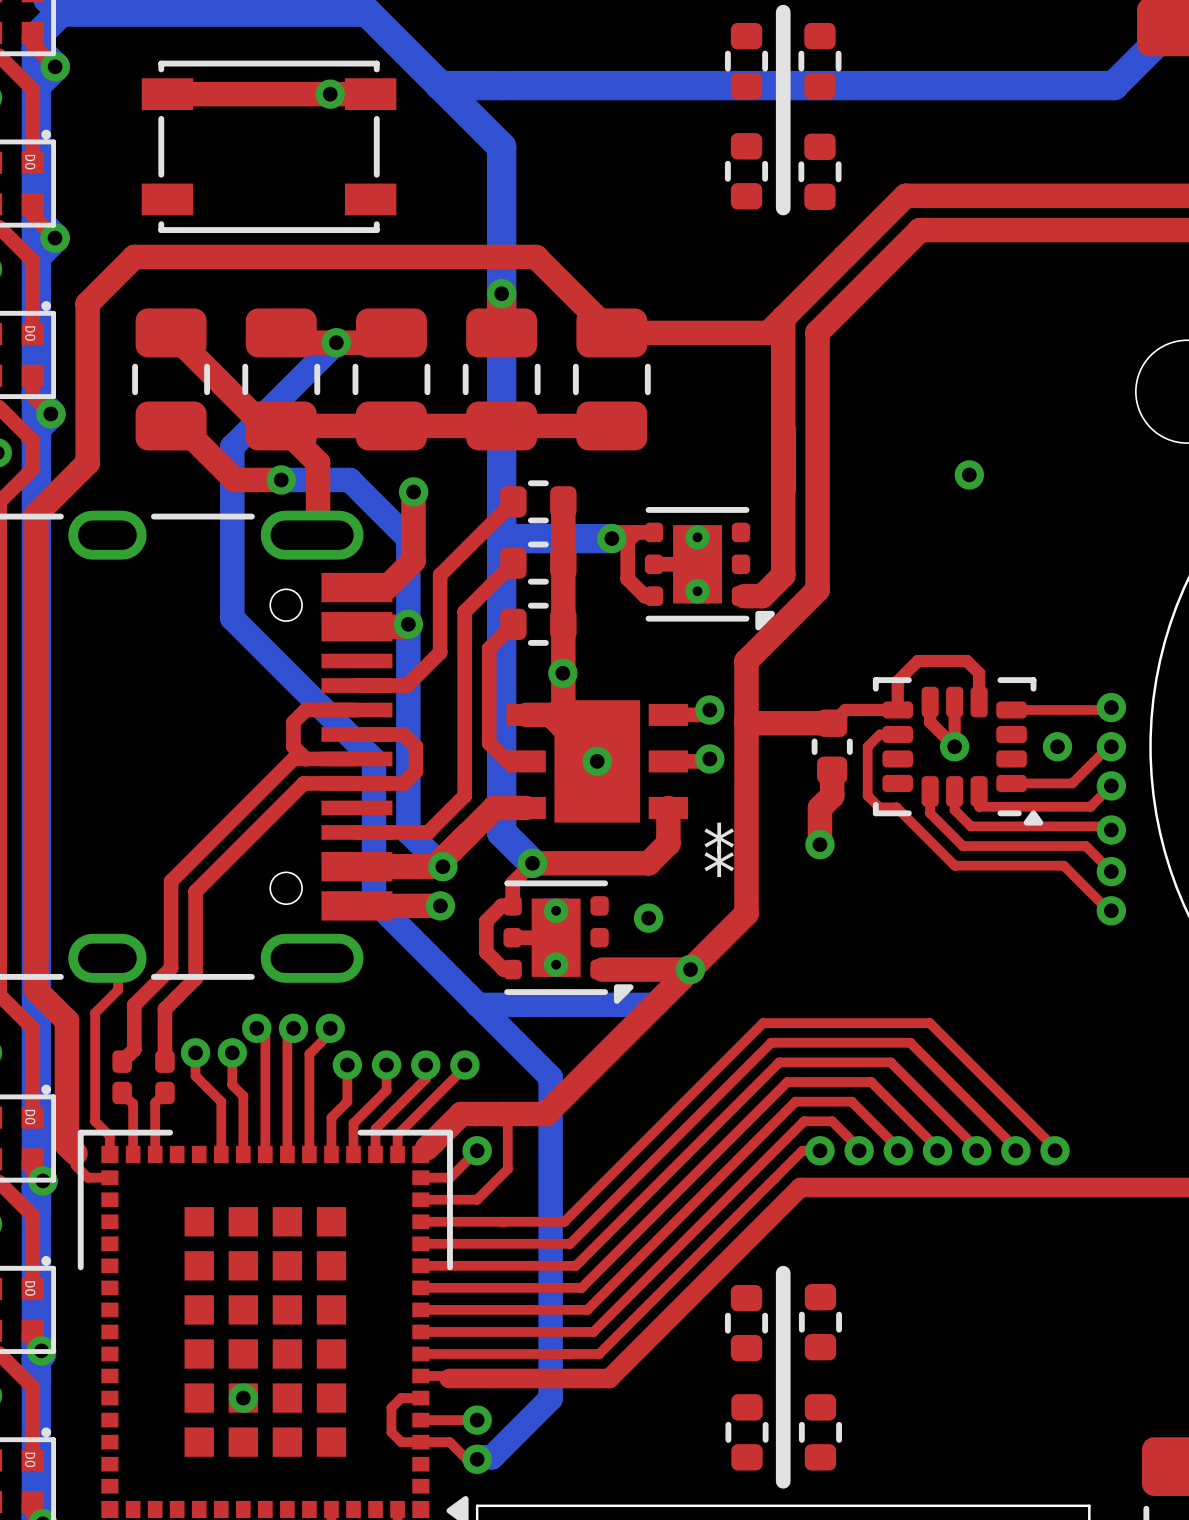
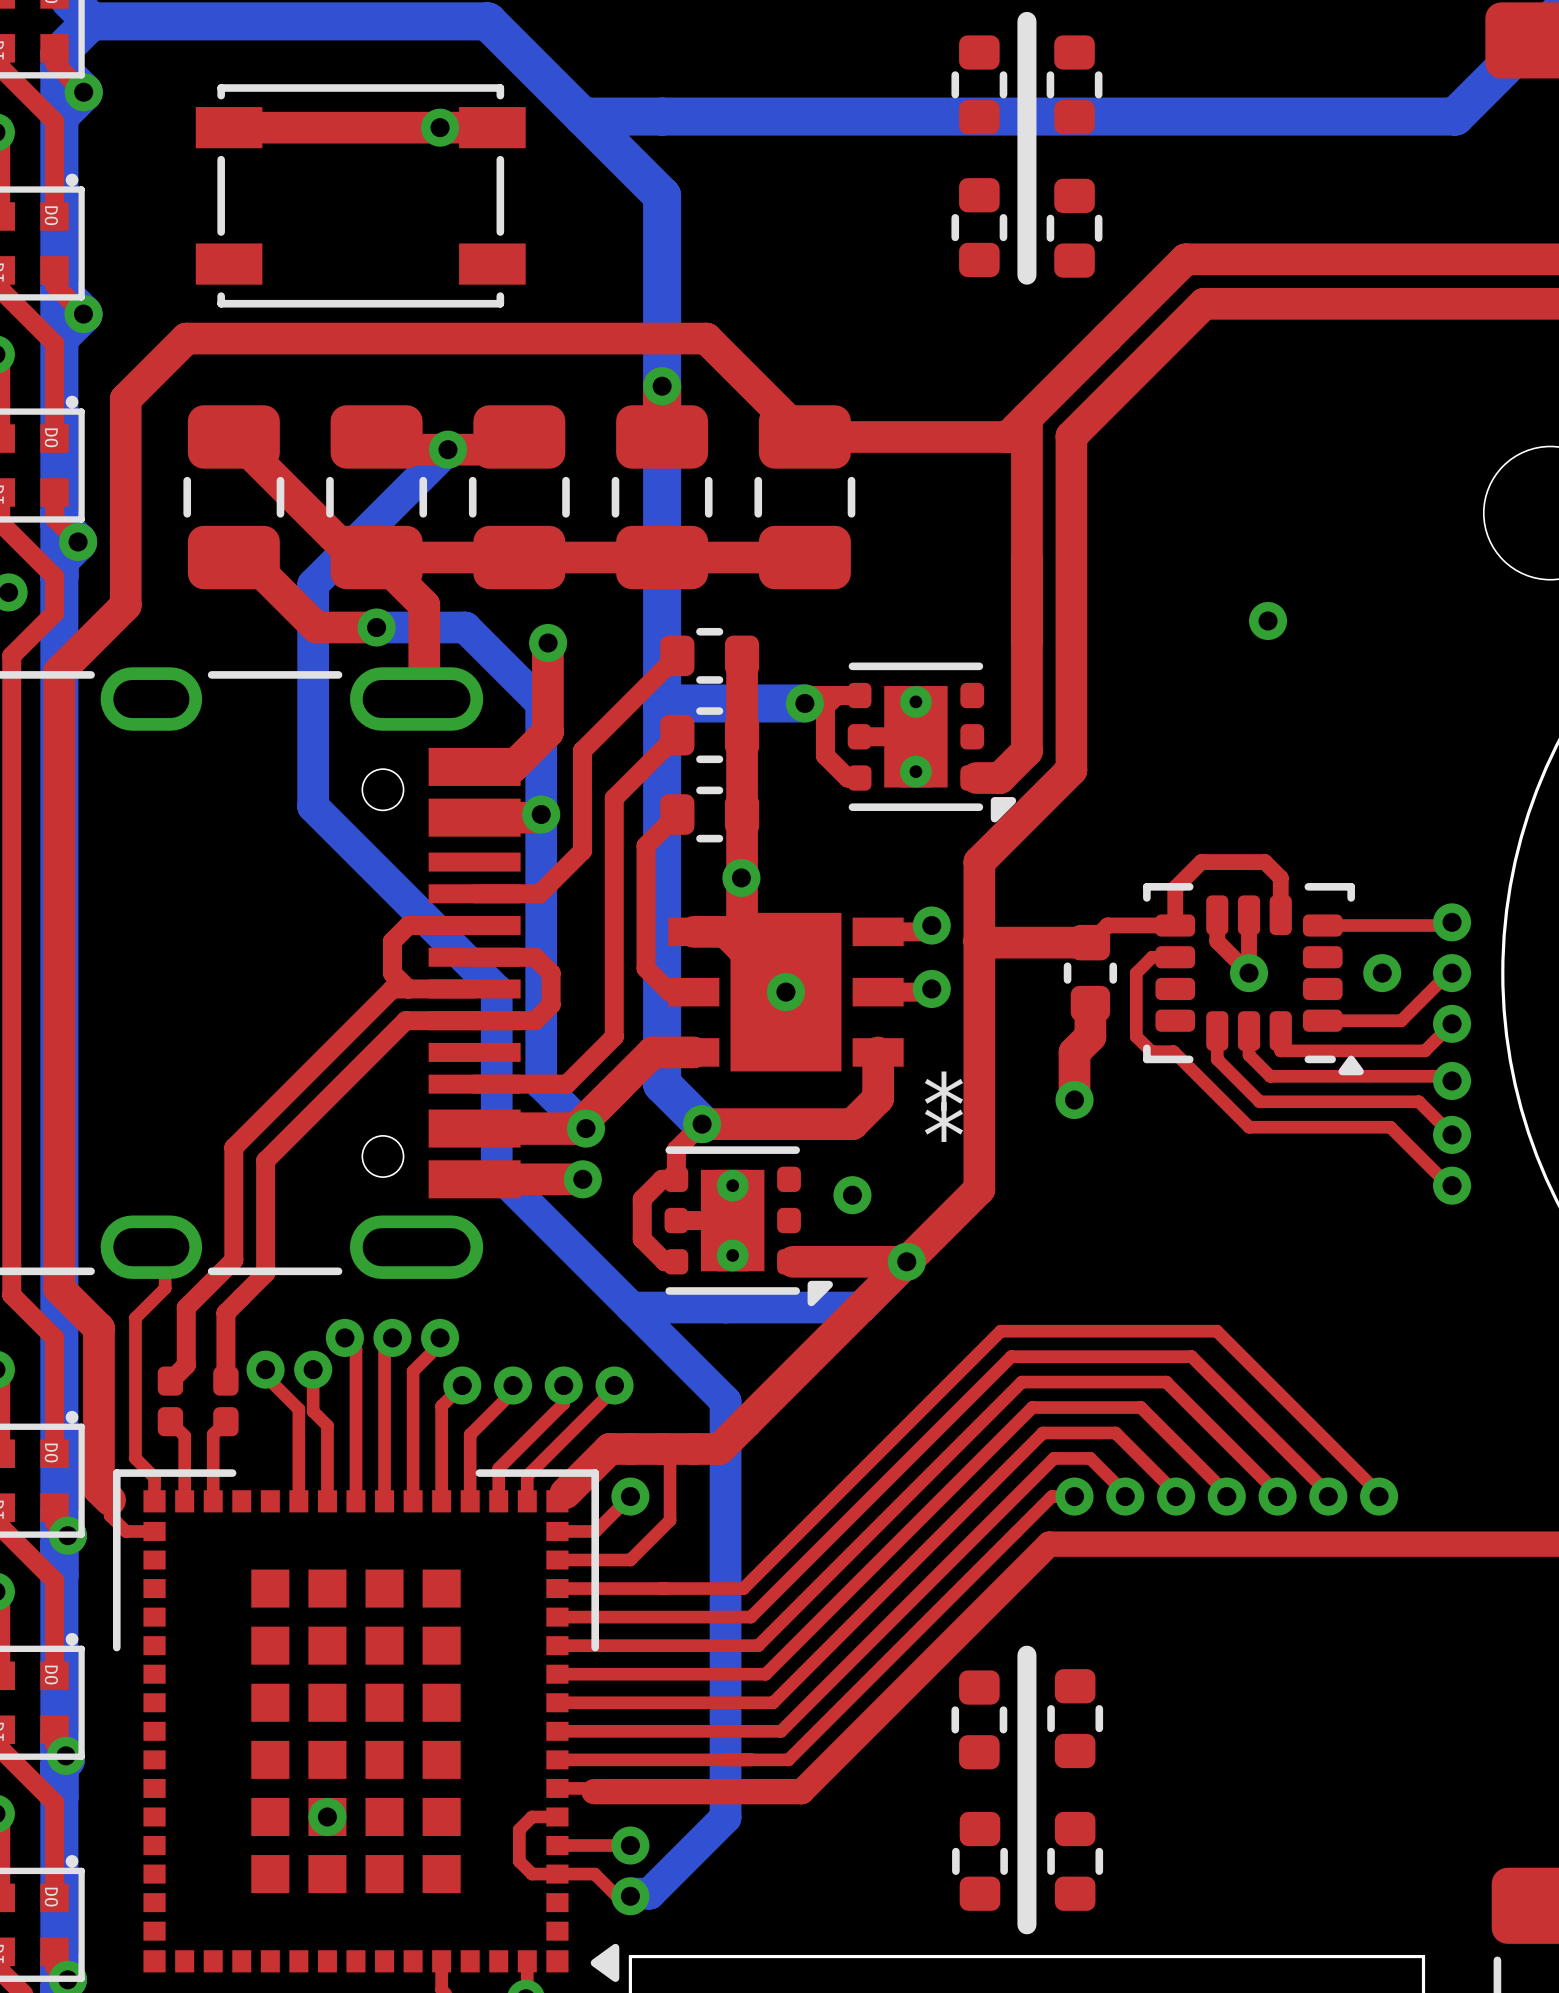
top track: (195, 1057) (195, 1076) (221, 1101) -> (265, 1376) (298, 1409) (298, 1433)
top track: (347, 1065) (347, 1101) (331, 1117) -> (462, 1385) (441, 1406) (441, 1453)
top track: (386, 1069) (386, 1090) (353, 1123) -> (513, 1391) (470, 1434) (470, 1461)

